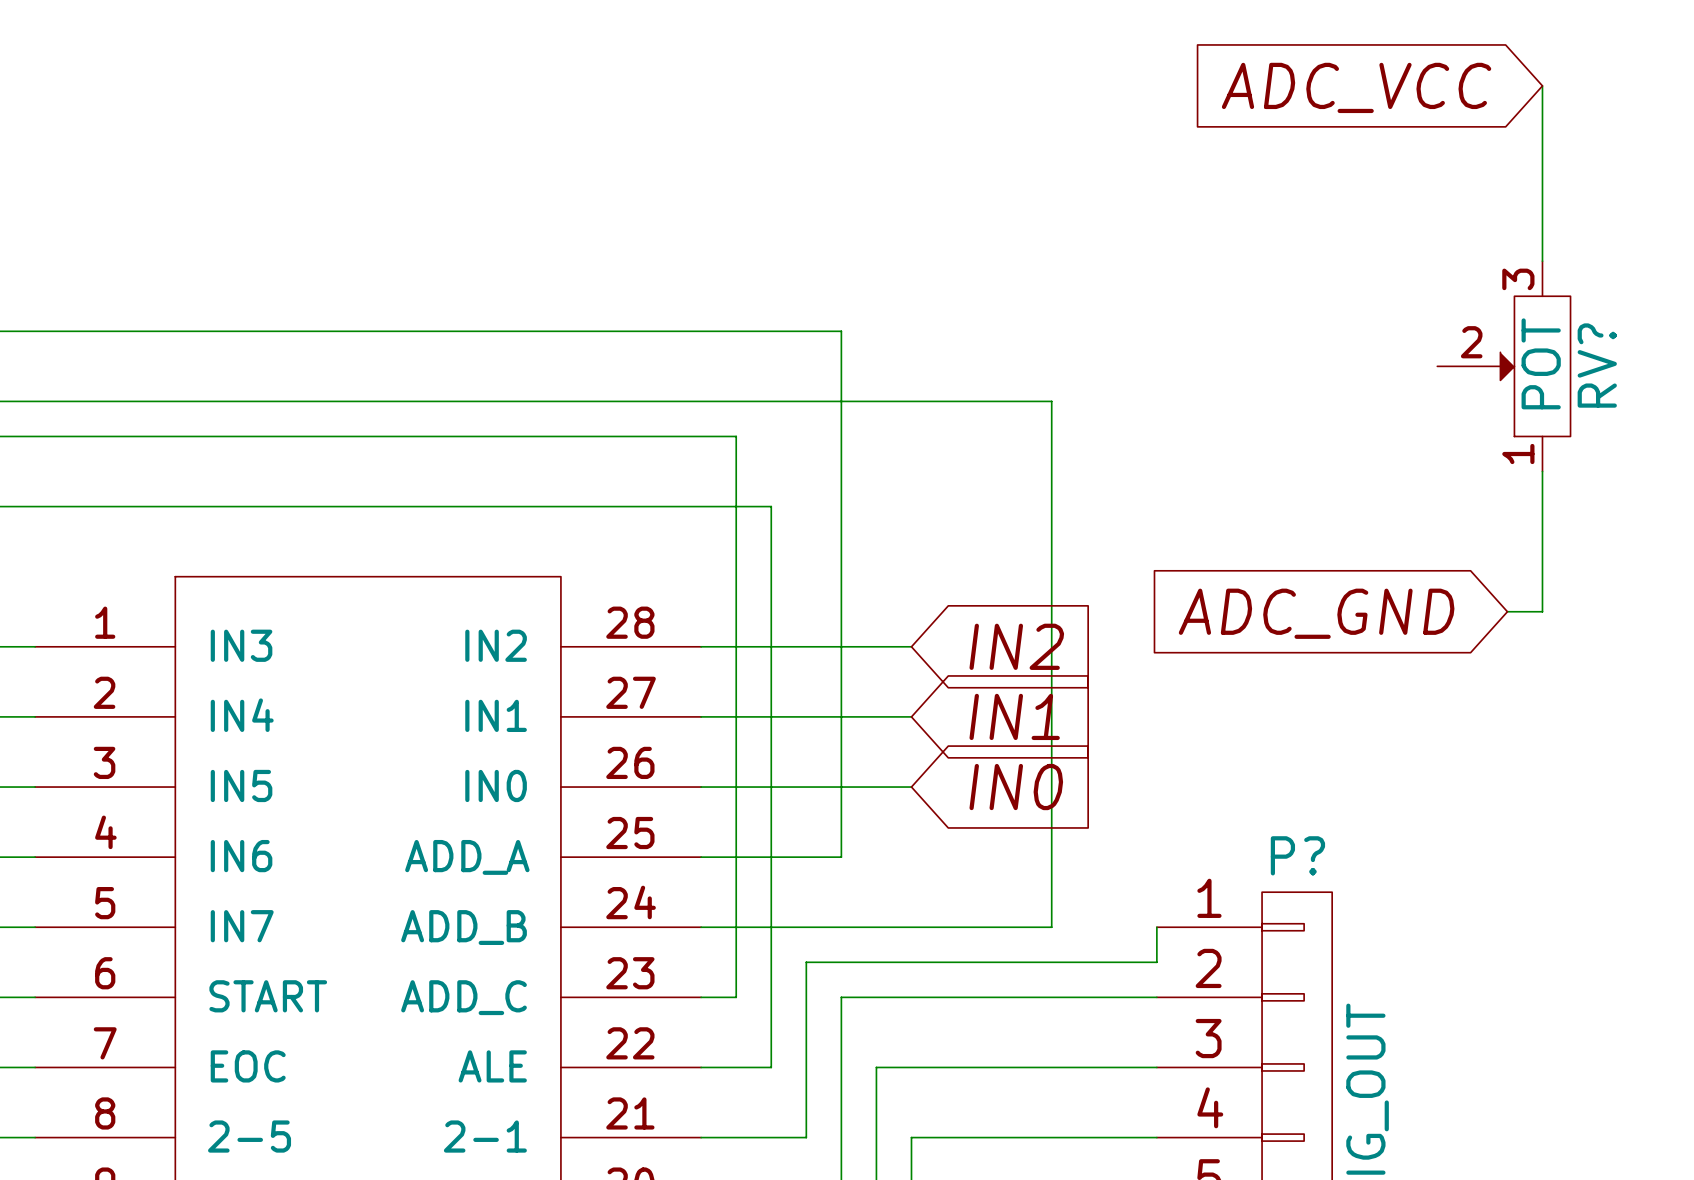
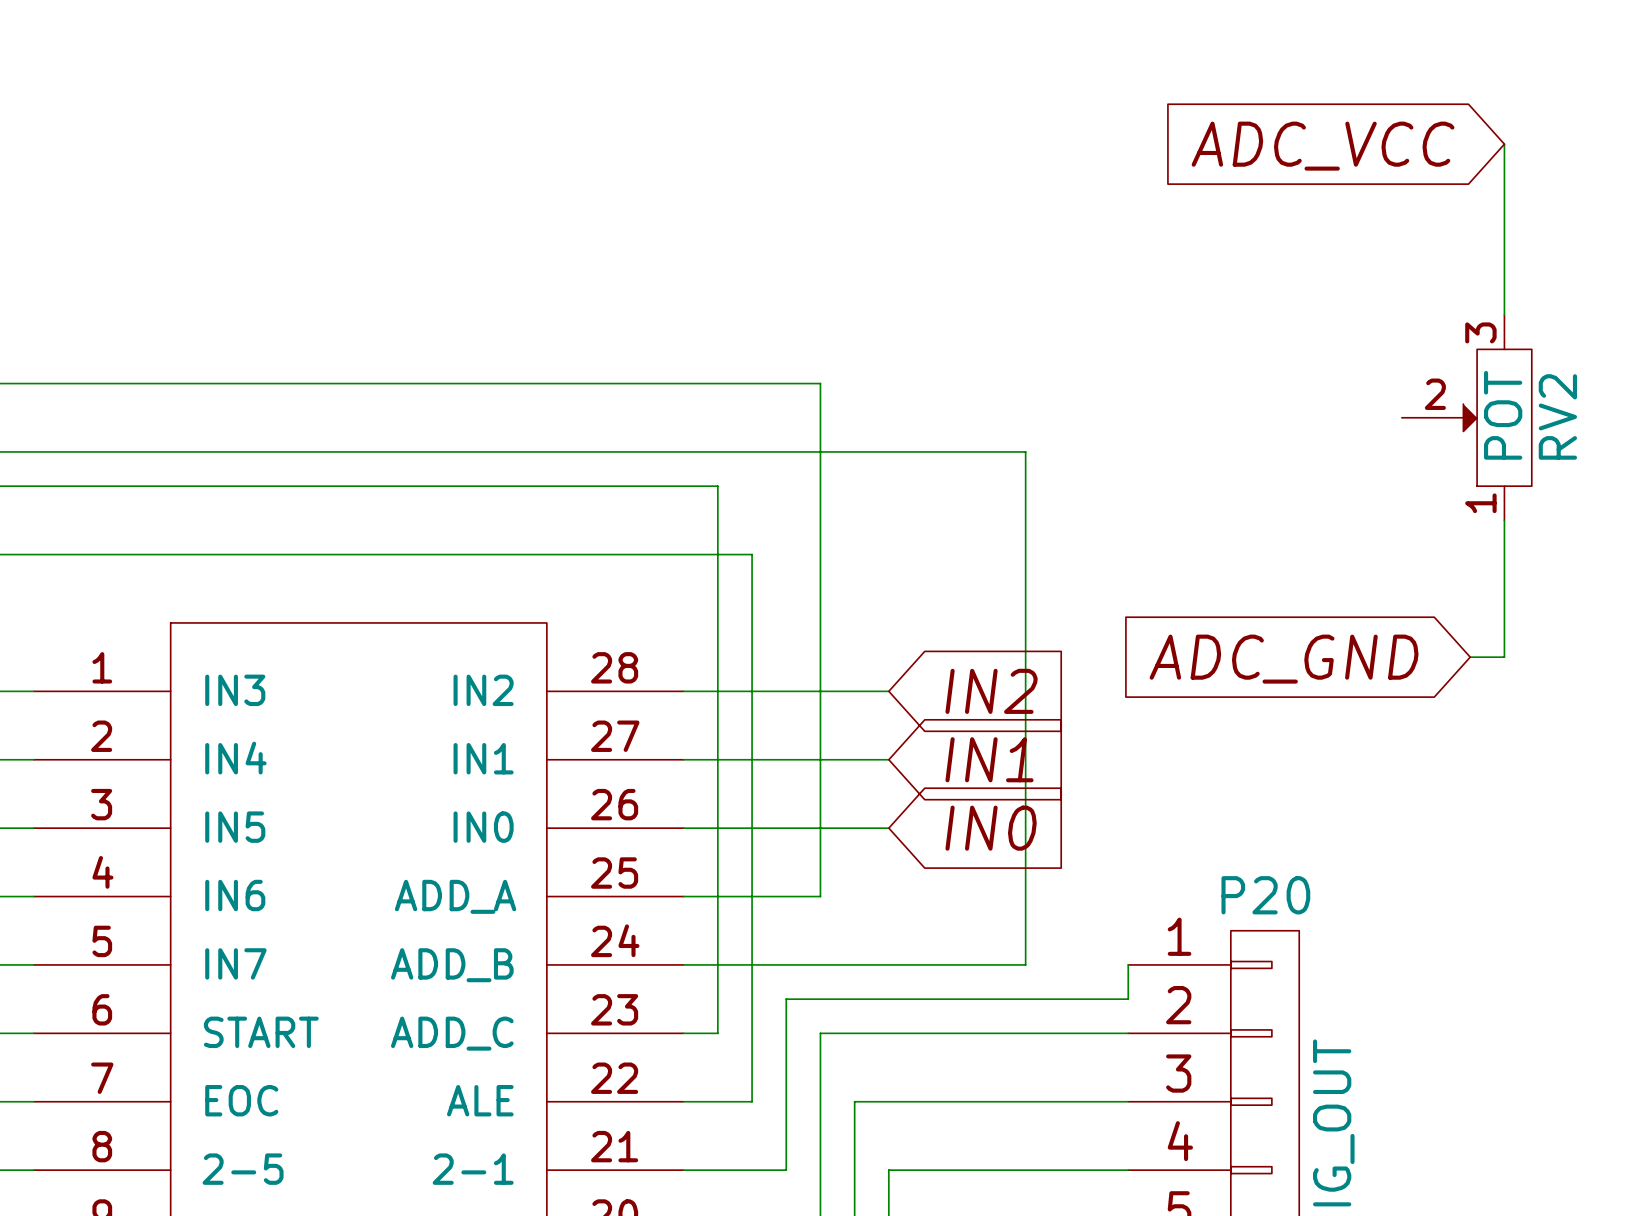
RV? name: RV? (1597, 365) -> RV2 (1557, 416)
P? name: P? (1297, 855) -> P20 (1265, 895)

